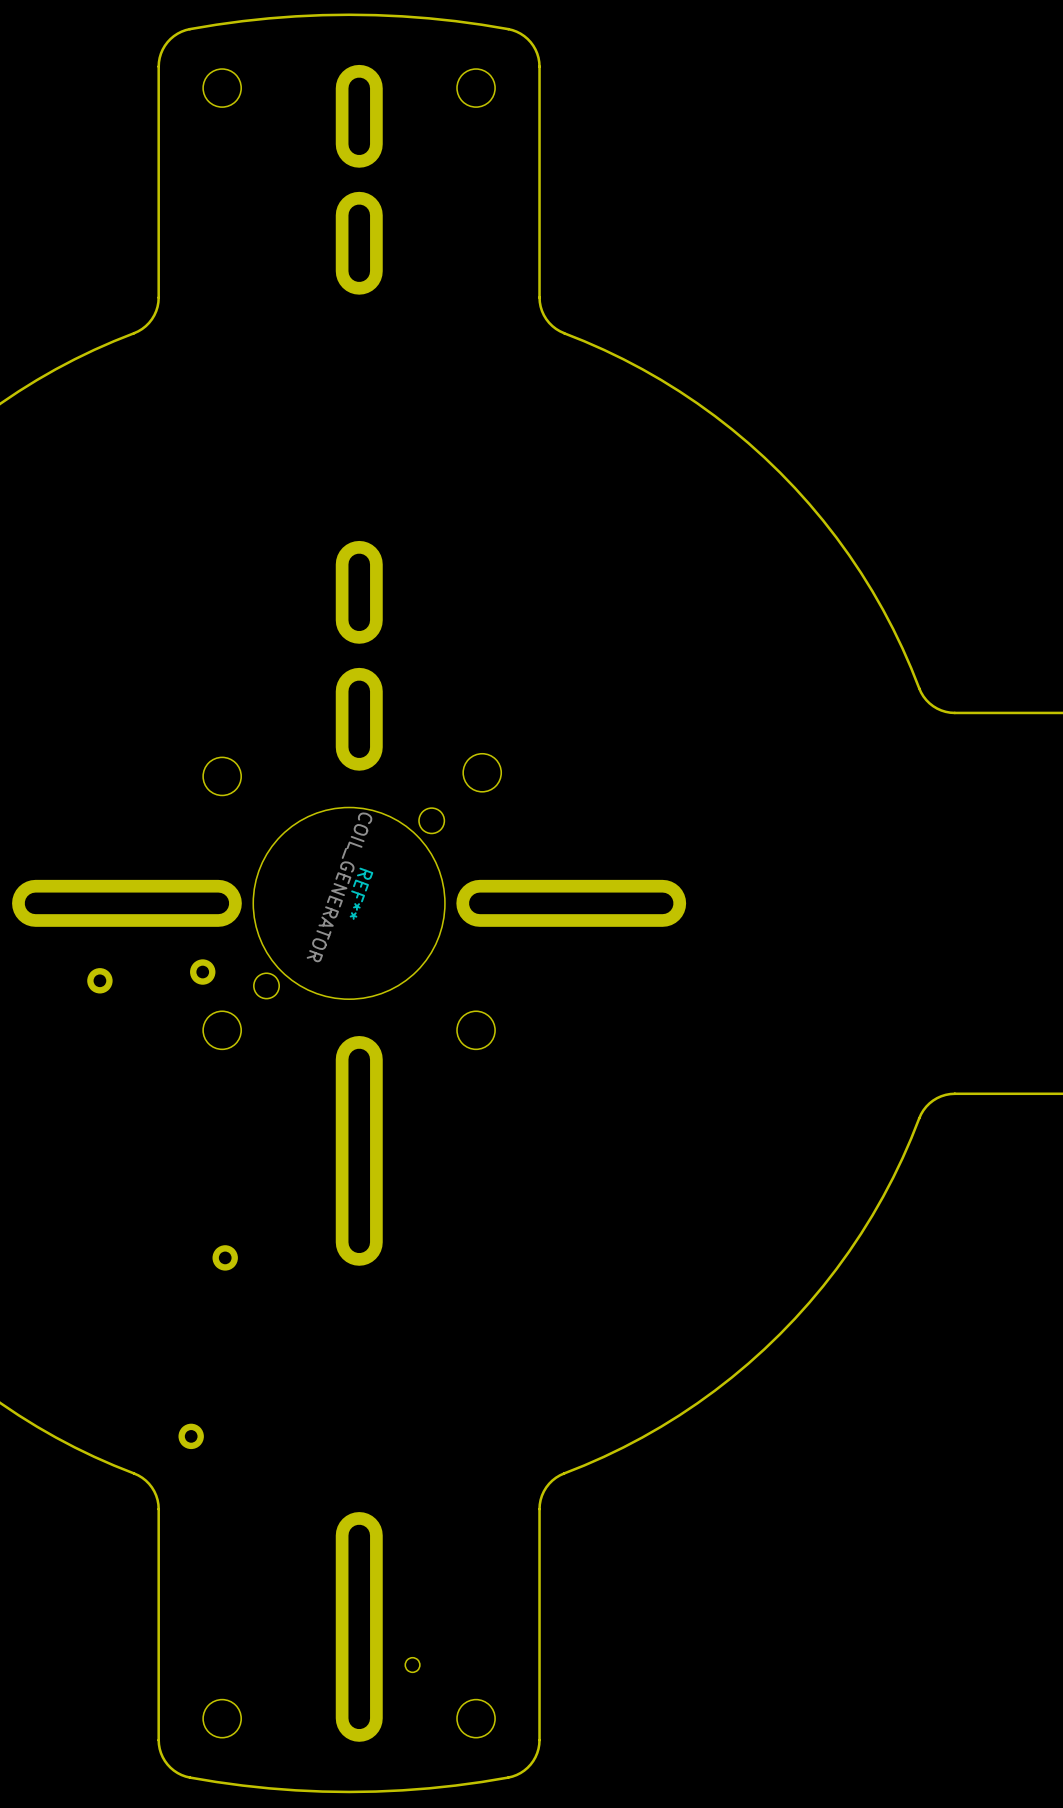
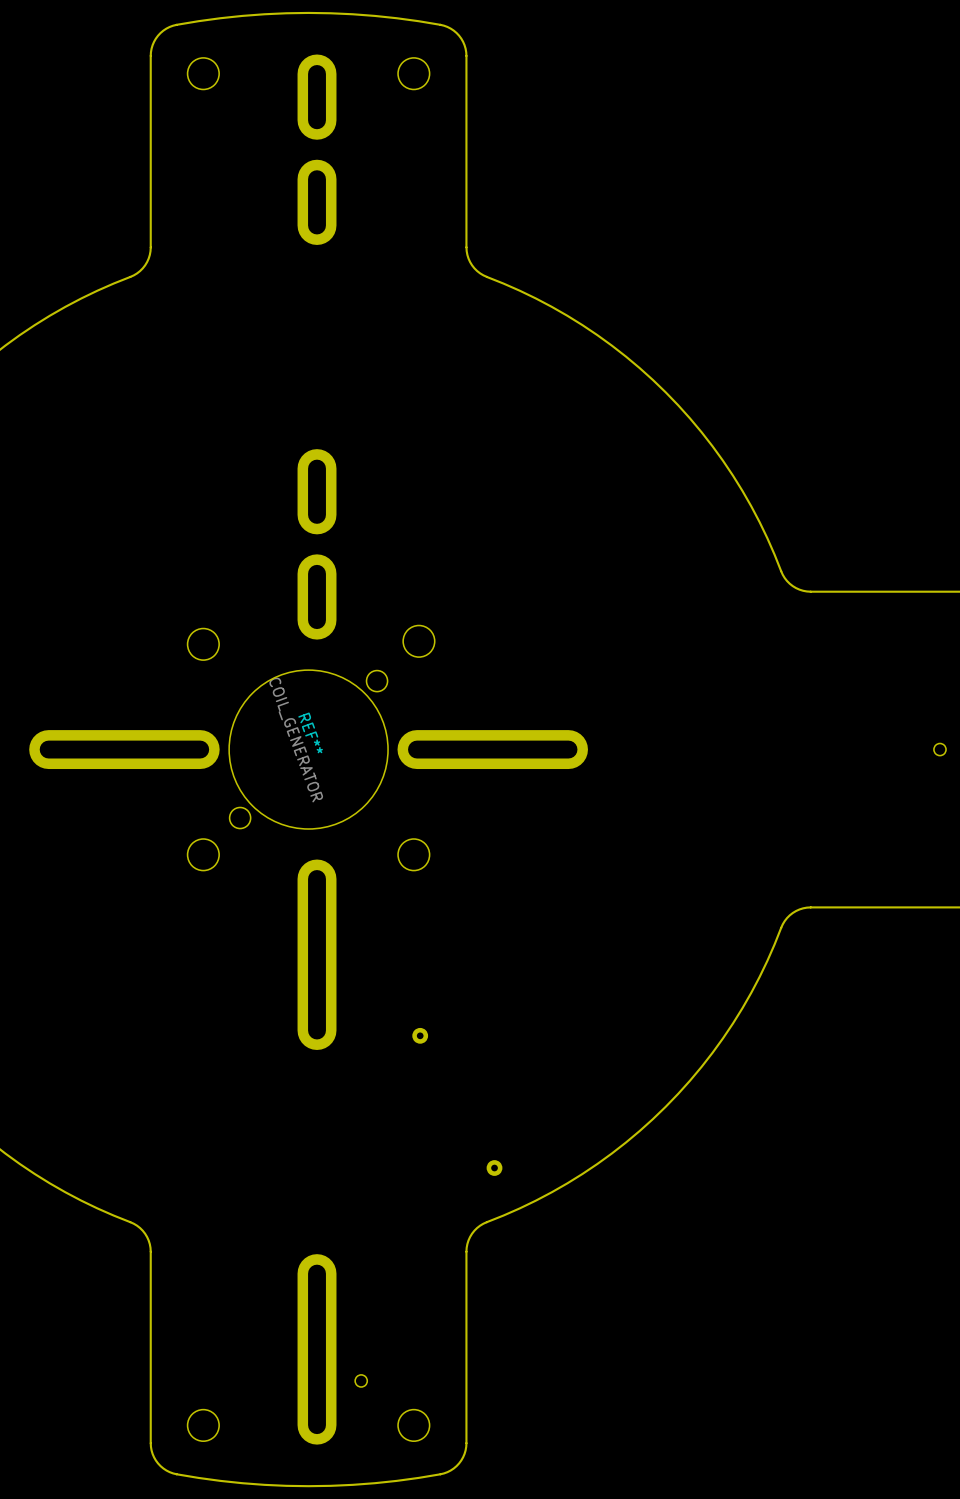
part: (202, 972) -> none
part: (99, 980) -> none
part: (225, 1257) -> none
REF**: none -> COIL_GENERATOR (457, 1101)
REF**: COIL_GENERATOR (208, 1347) -> none
part: (191, 1436) -> none

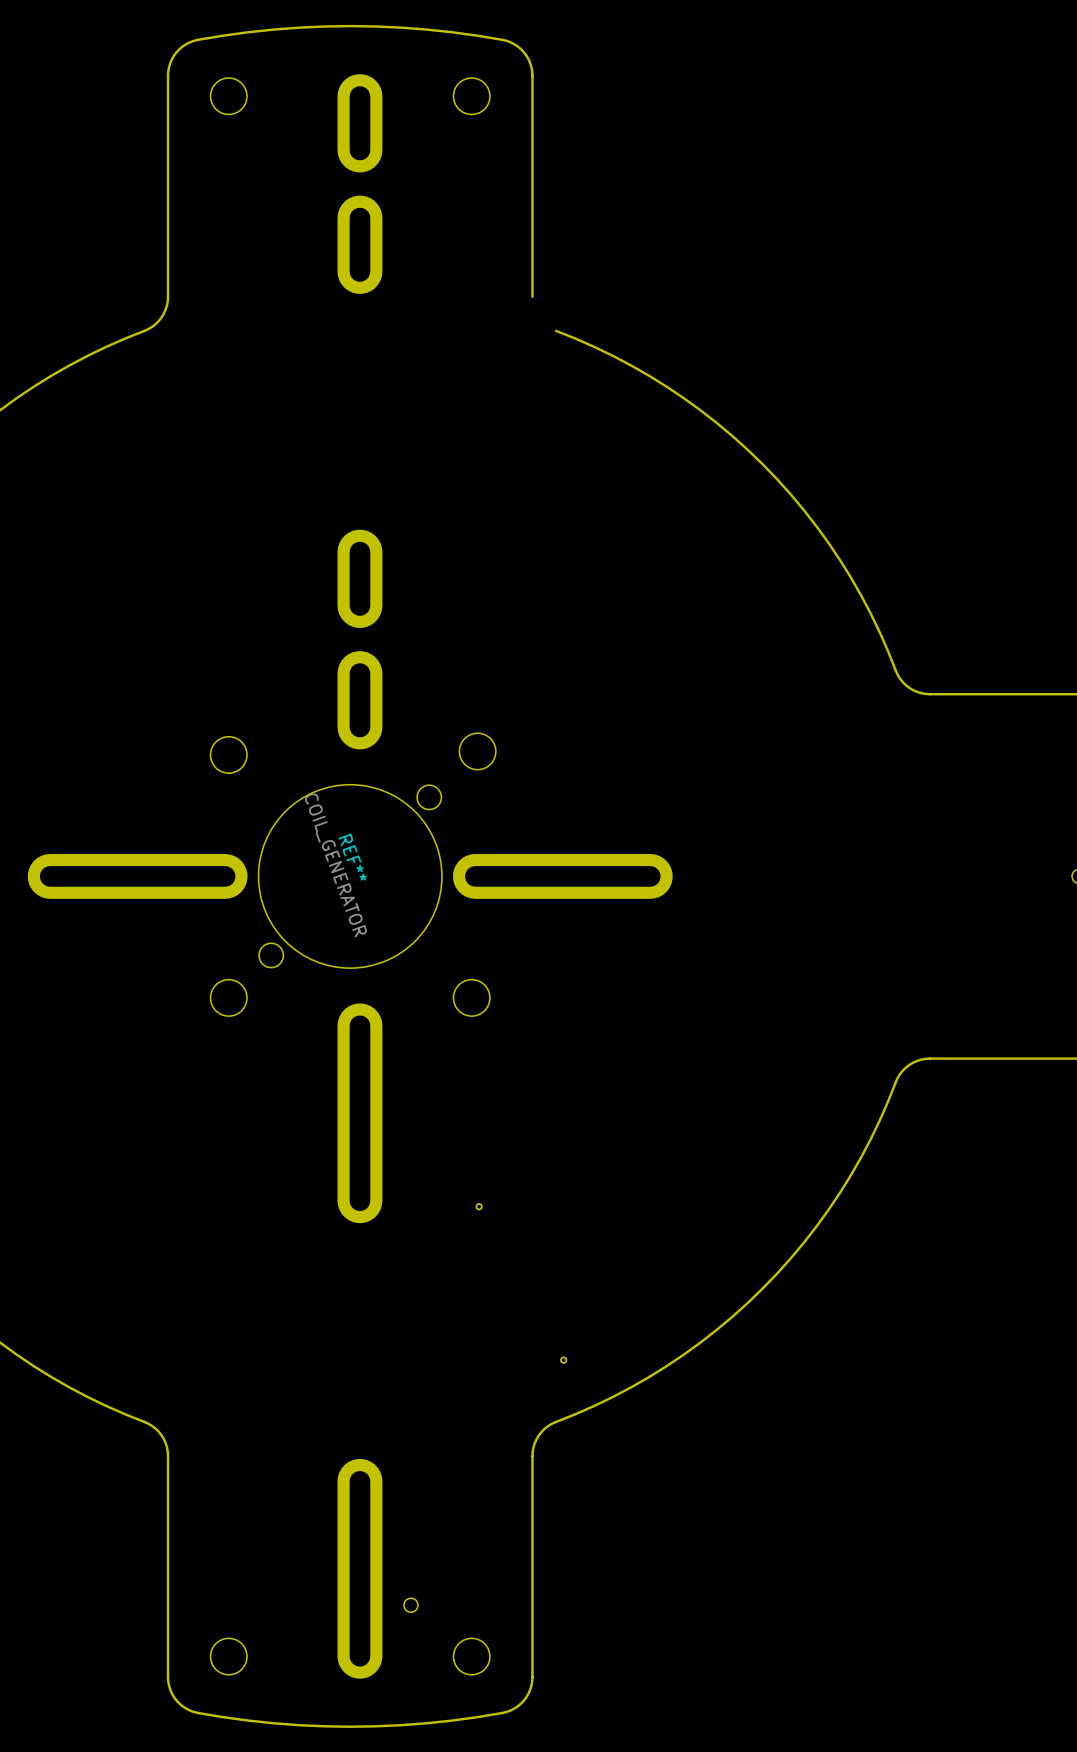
board edge: (466, 247) (472, 265) (486, 276) -> none
REF** footprint: [412, 1027, 503, 1176] -> [475, 1203, 568, 1364]

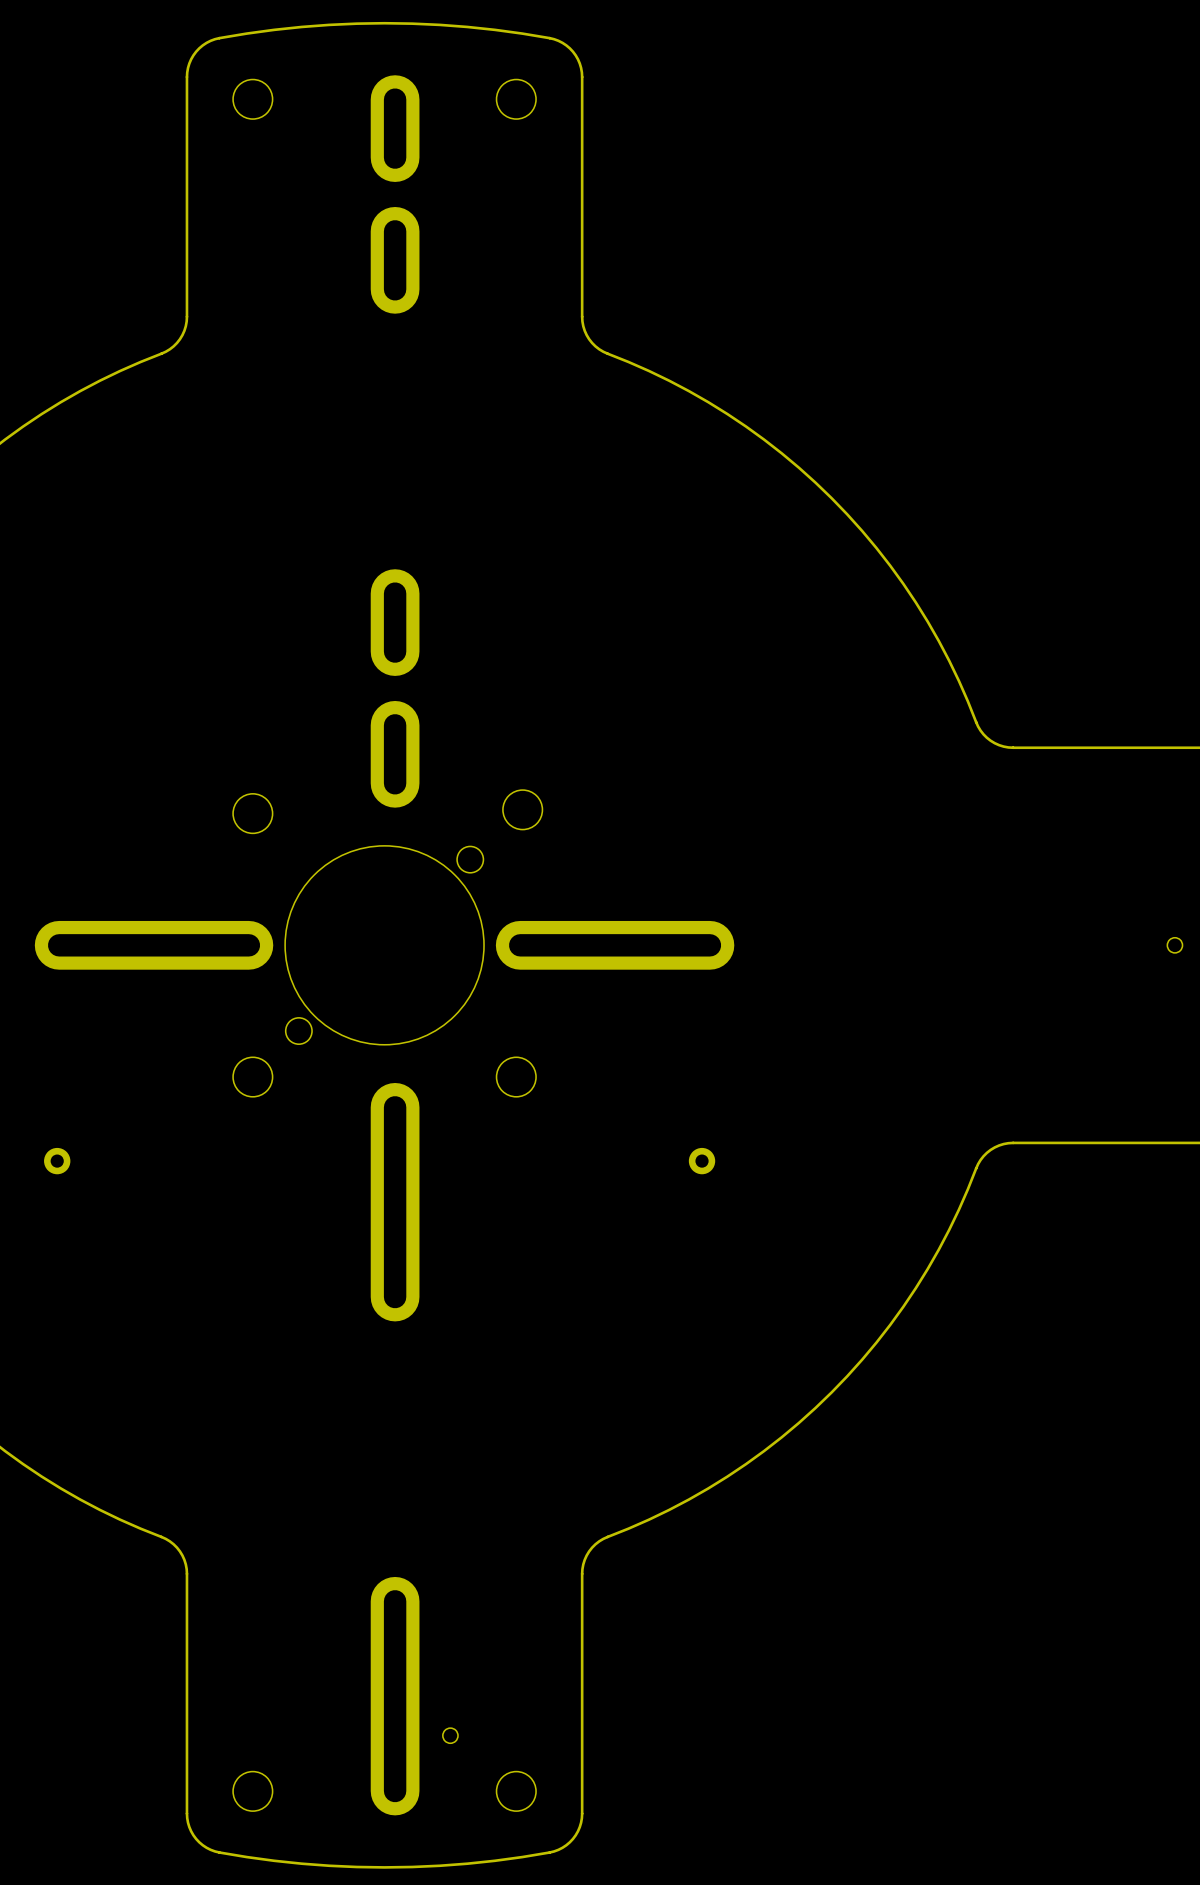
board edge: none -> (582, 316) (584, 330) (589, 339) (599, 349) (607, 353)
part: none -> (57, 1161)
part: none -> (702, 1161)
REF**: COIL_GENERATOR (521, 1283) -> none

